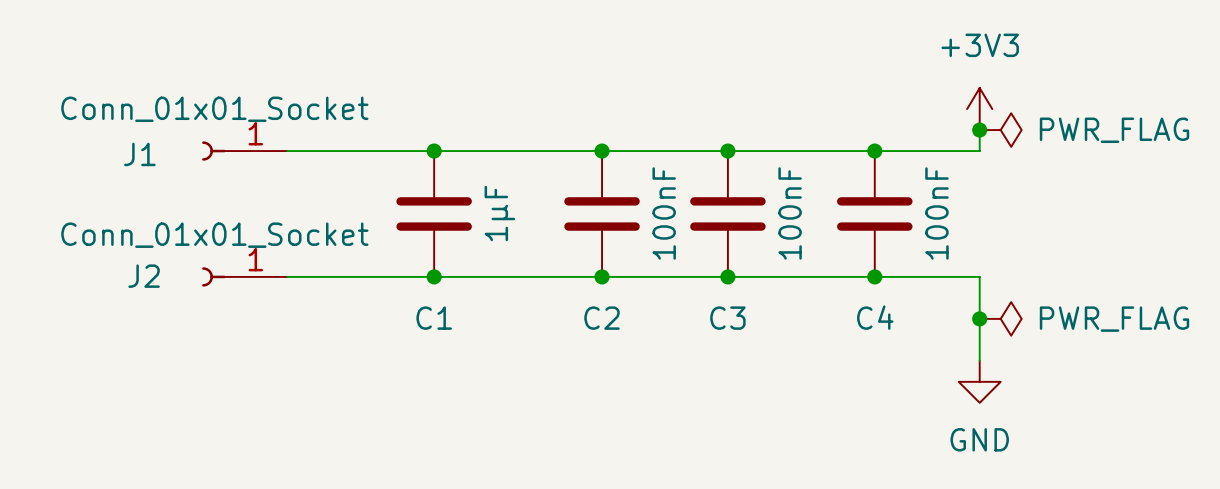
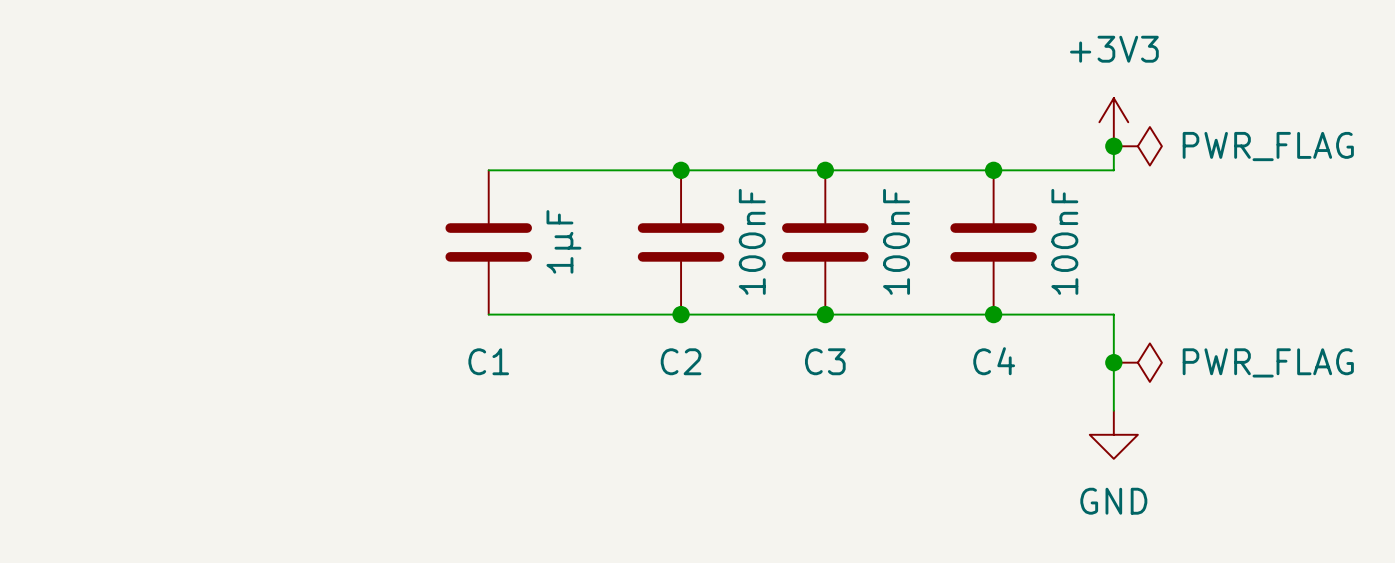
J1: Conn_01x01_Socket (244, 151) -> none
wire: (287, 151) (434, 151) -> none
junction: (434, 151) -> none
J2: Conn_01x01_Socket (244, 276) -> none
wire: (287, 276) (434, 276) -> none
junction: (434, 276) -> none

